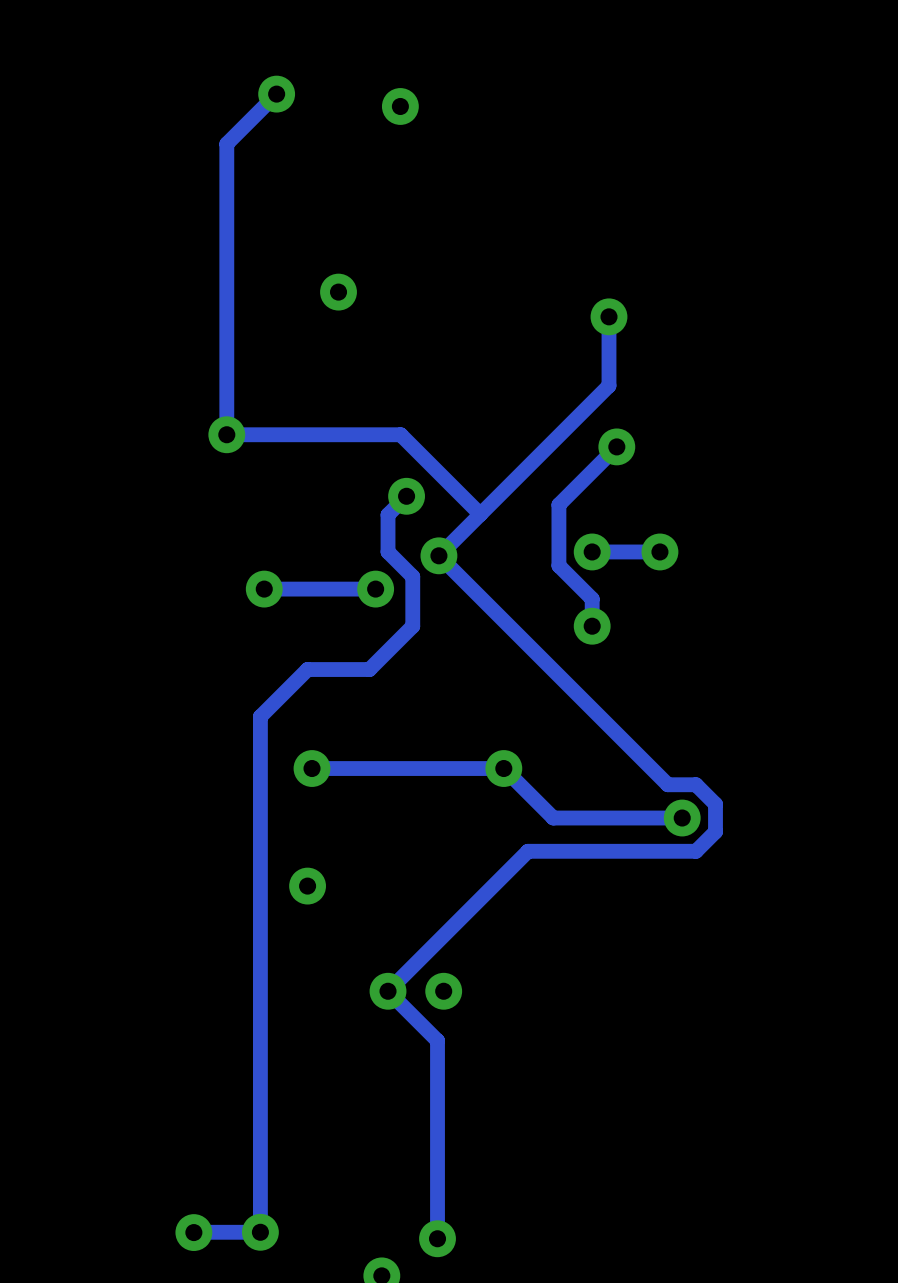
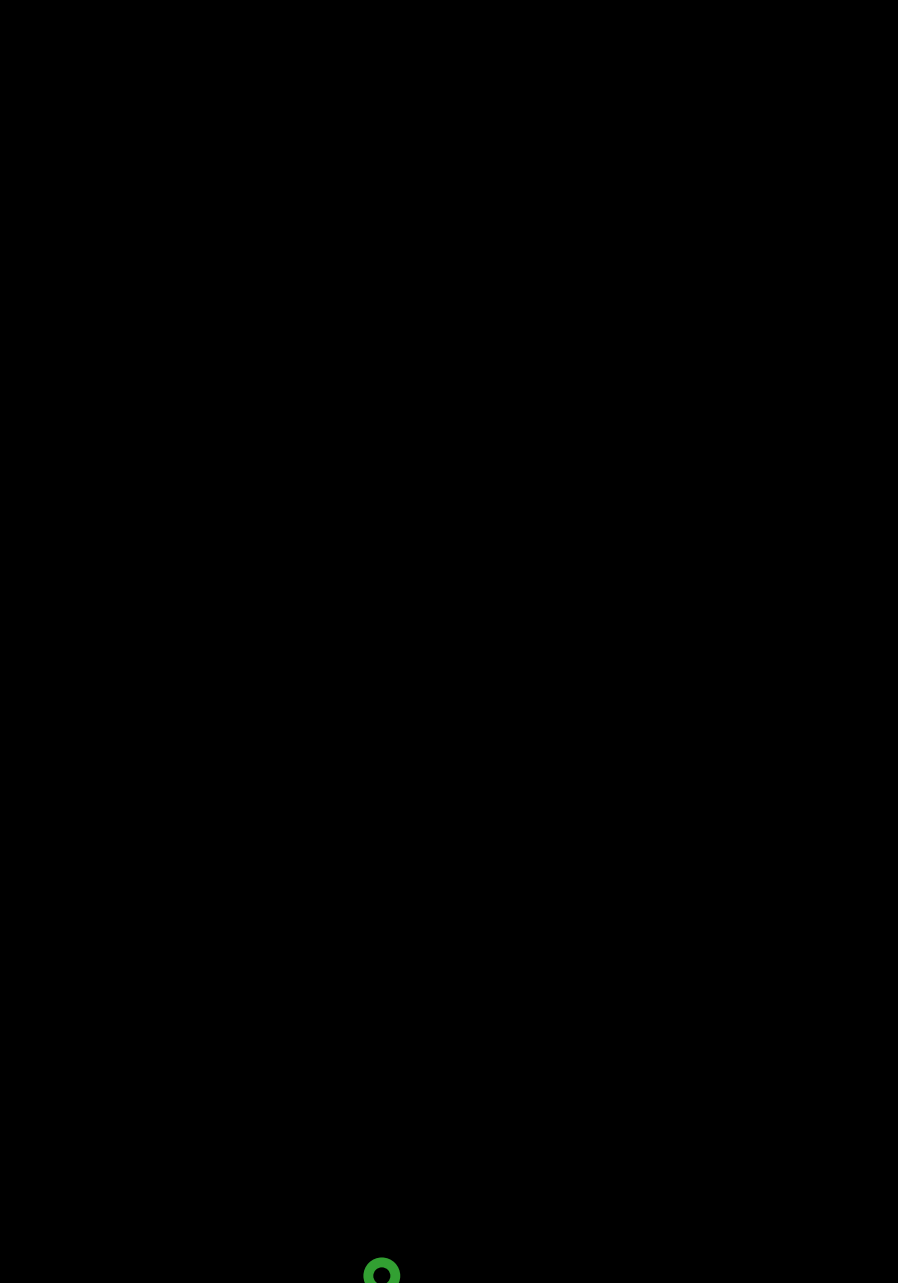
track: (276, 94) (226, 143) (226, 434) (400, 434) (480, 514) -> none
via: (276, 94) -> none
via: (400, 106) -> none
via: (338, 292) -> none
track: (608, 316) (608, 385) (438, 555) (667, 784) (696, 784) (715, 804) (715, 831) (696, 851) (527, 851) (388, 991) (437, 1040) (437, 1238) -> none
via: (608, 316) -> none
via: (226, 434) -> none
track: (616, 446) (558, 504) (558, 565) (592, 599) (592, 626) -> none
via: (616, 446) -> none
track: (406, 496) (388, 514) (388, 551) (412, 576) (412, 626) (369, 669) (307, 669) (260, 716) (260, 1232) (194, 1232) -> none
via: (406, 496) -> none
via: (592, 551) -> none
track: (659, 551) (592, 551) -> none
via: (659, 551) -> none
via: (438, 555) -> none
via: (264, 589) -> none
track: (375, 589) (264, 589) -> none
via: (375, 589) -> none
via: (592, 626) -> none
track: (312, 768) (503, 768) (553, 818) (682, 818) -> none
via: (312, 768) -> none
via: (503, 768) -> none
via: (682, 818) -> none
via: (307, 886) -> none
via: (388, 991) -> none
via: (443, 991) -> none
via: (193, 1232) -> none
via: (260, 1232) -> none
via: (437, 1238) -> none

